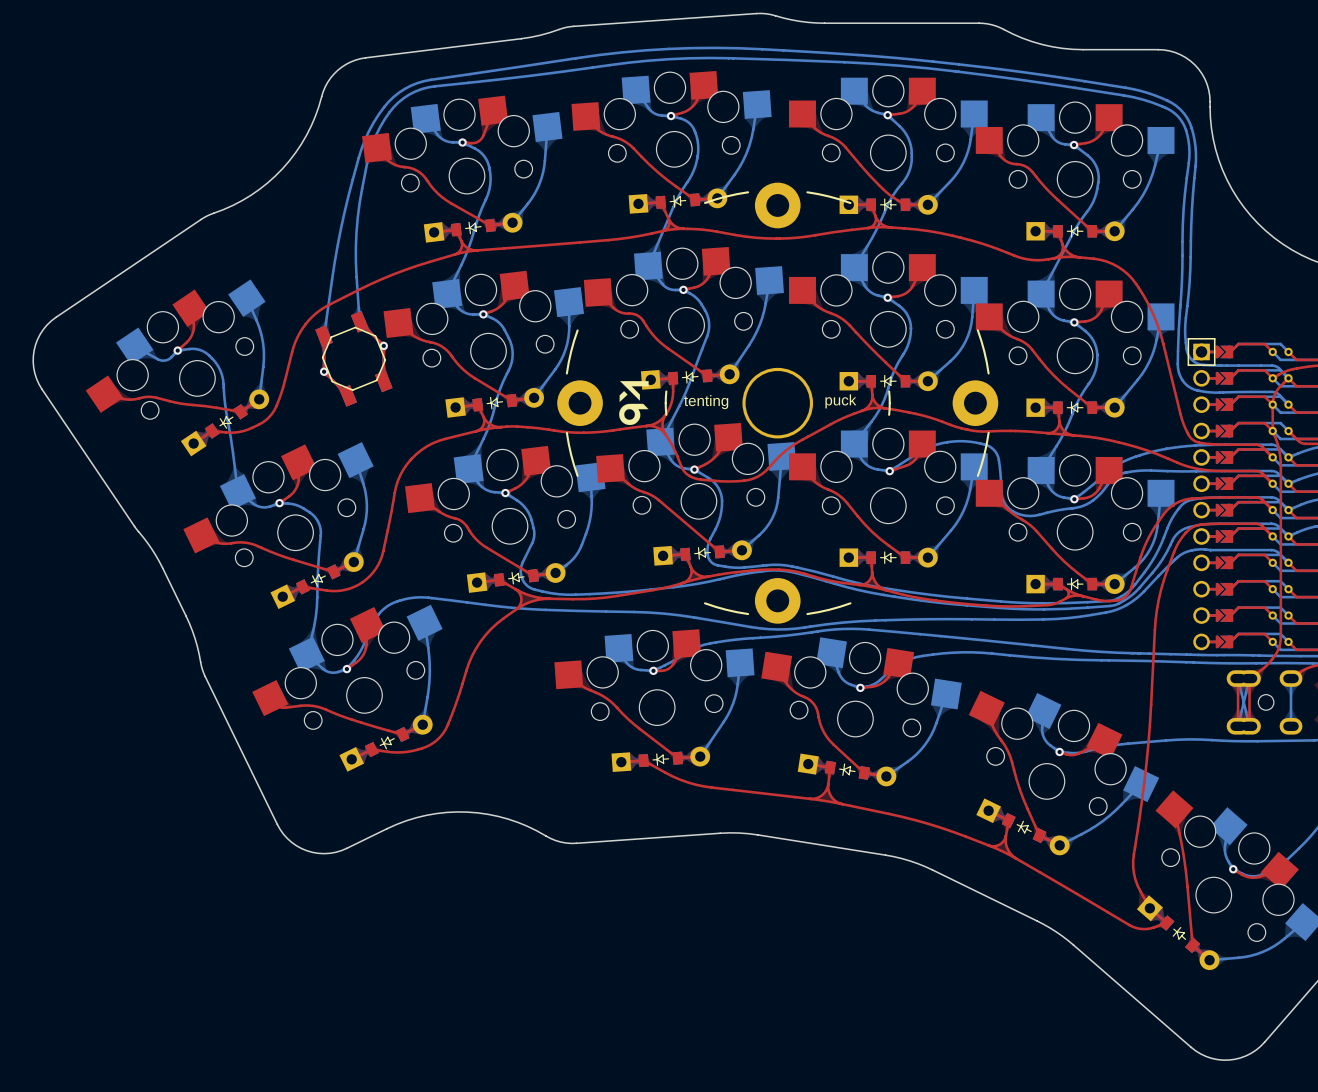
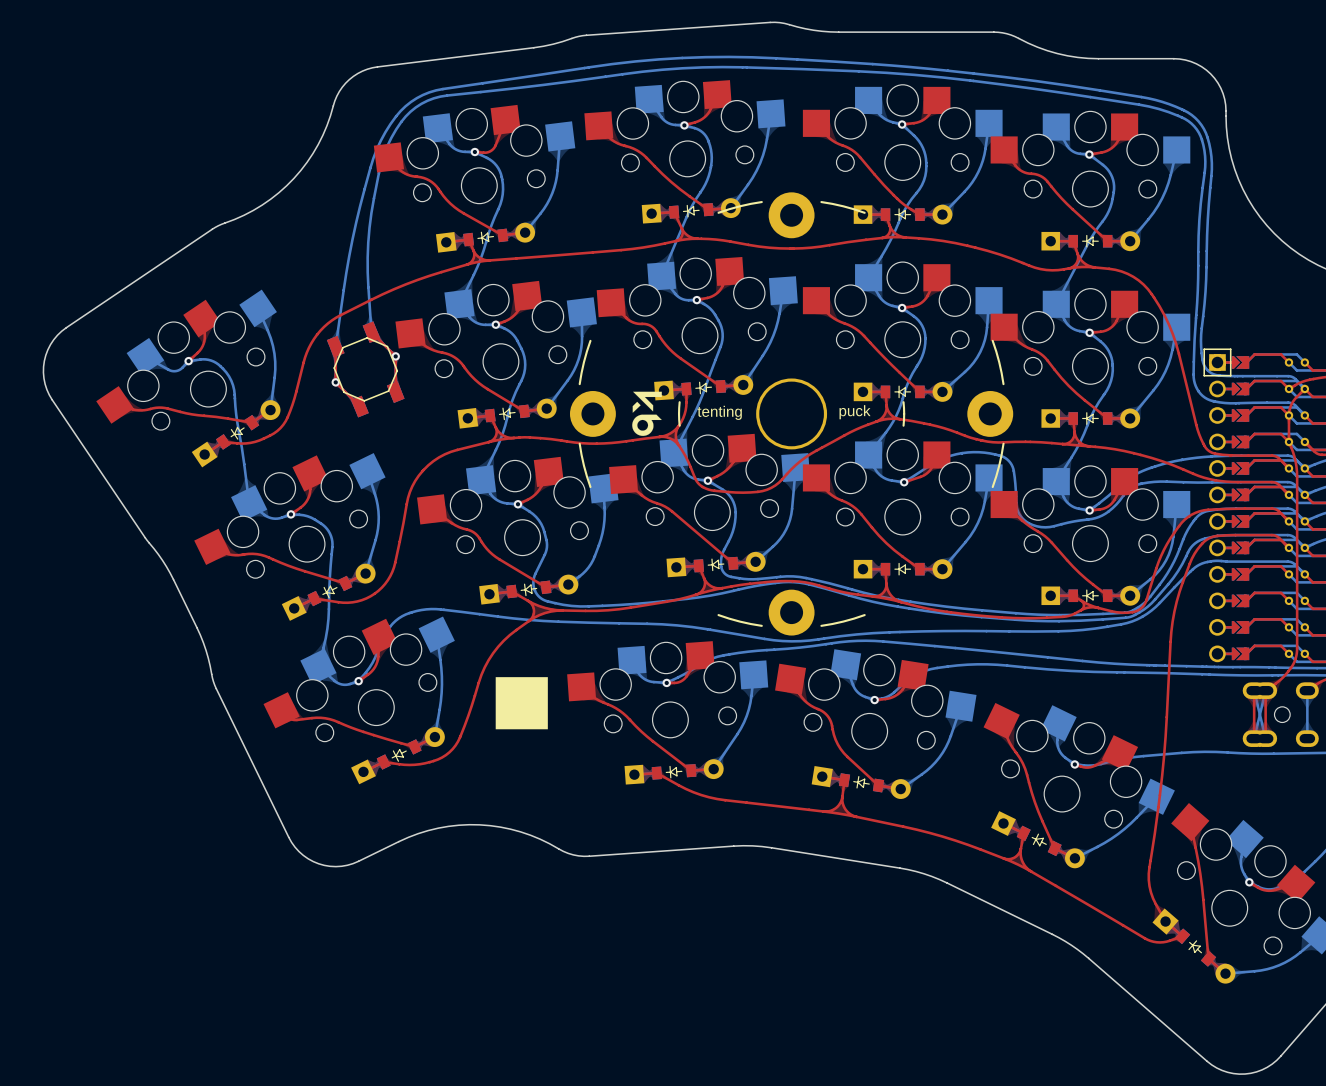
drawing: none -> [495, 677, 548, 730]

